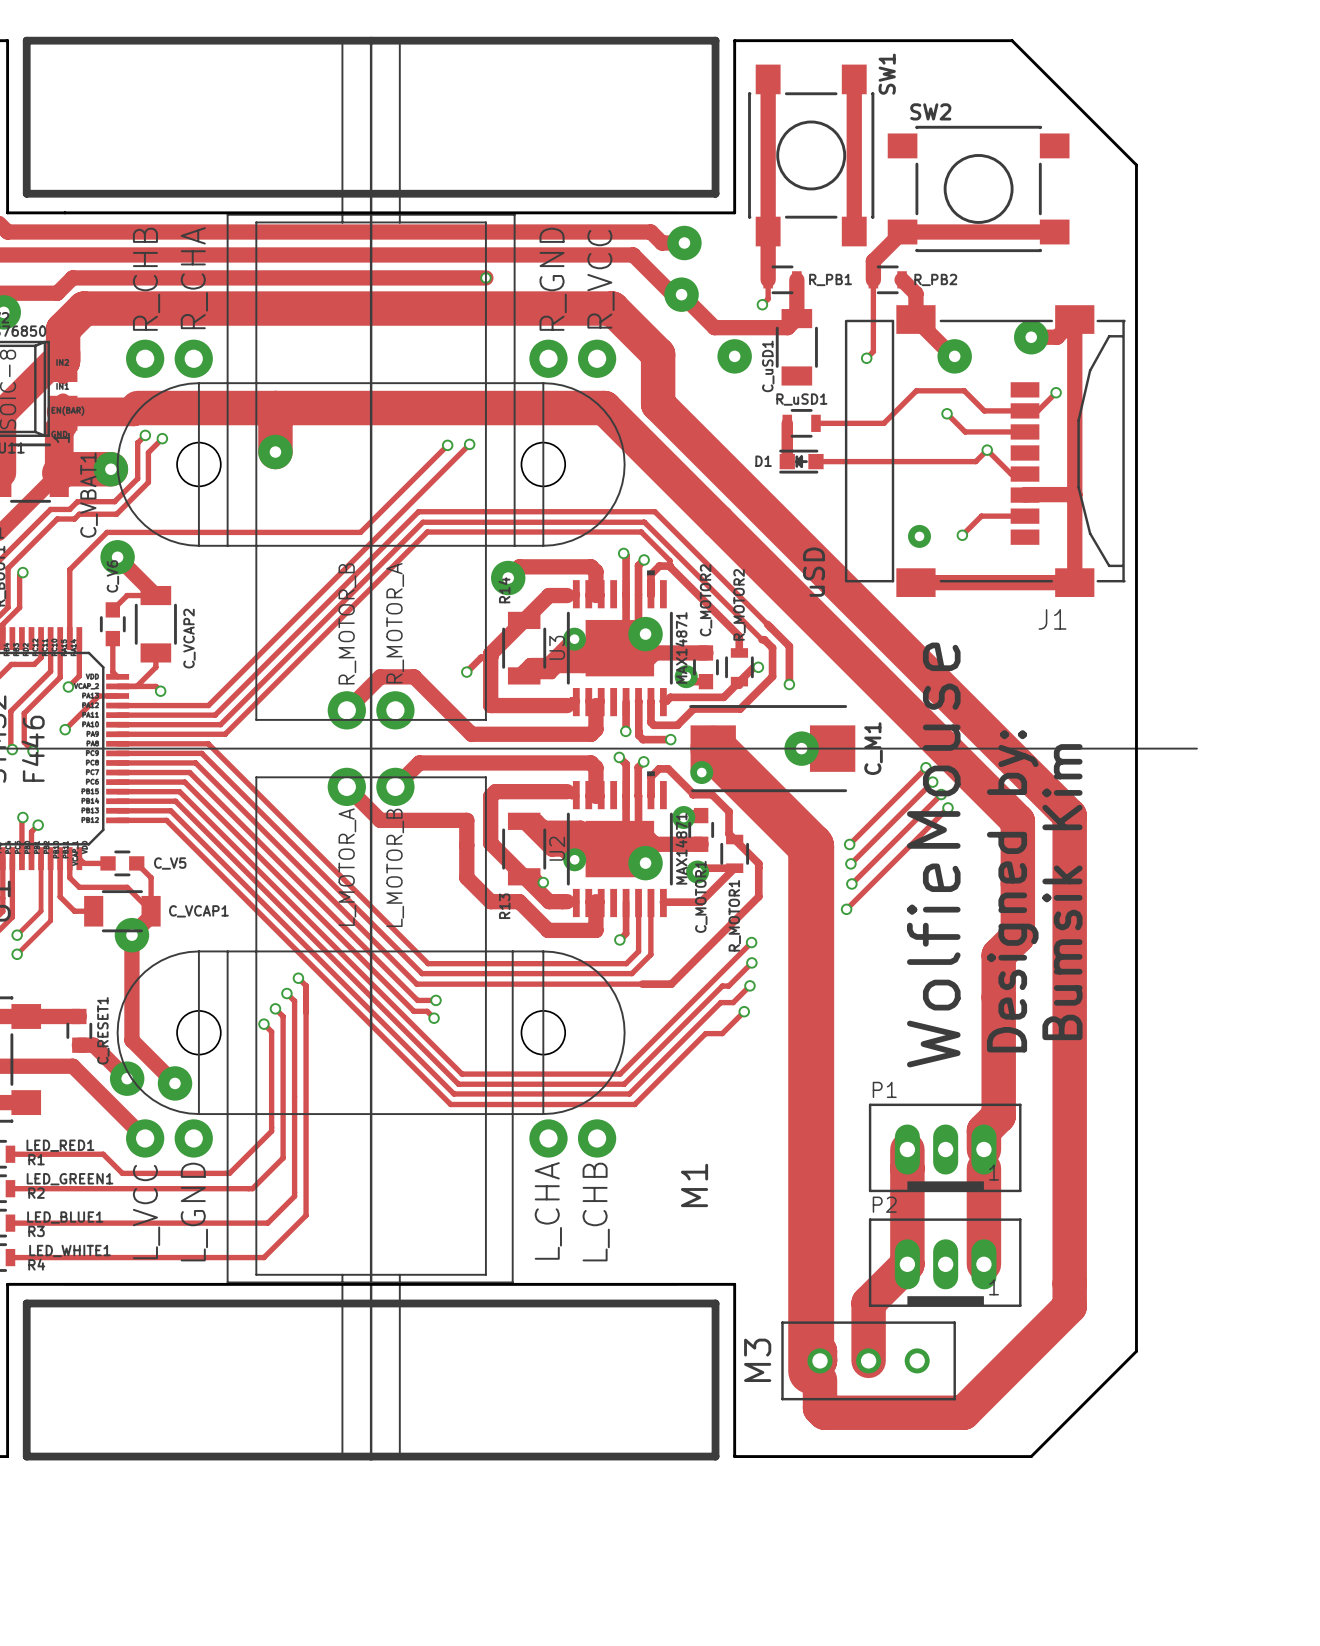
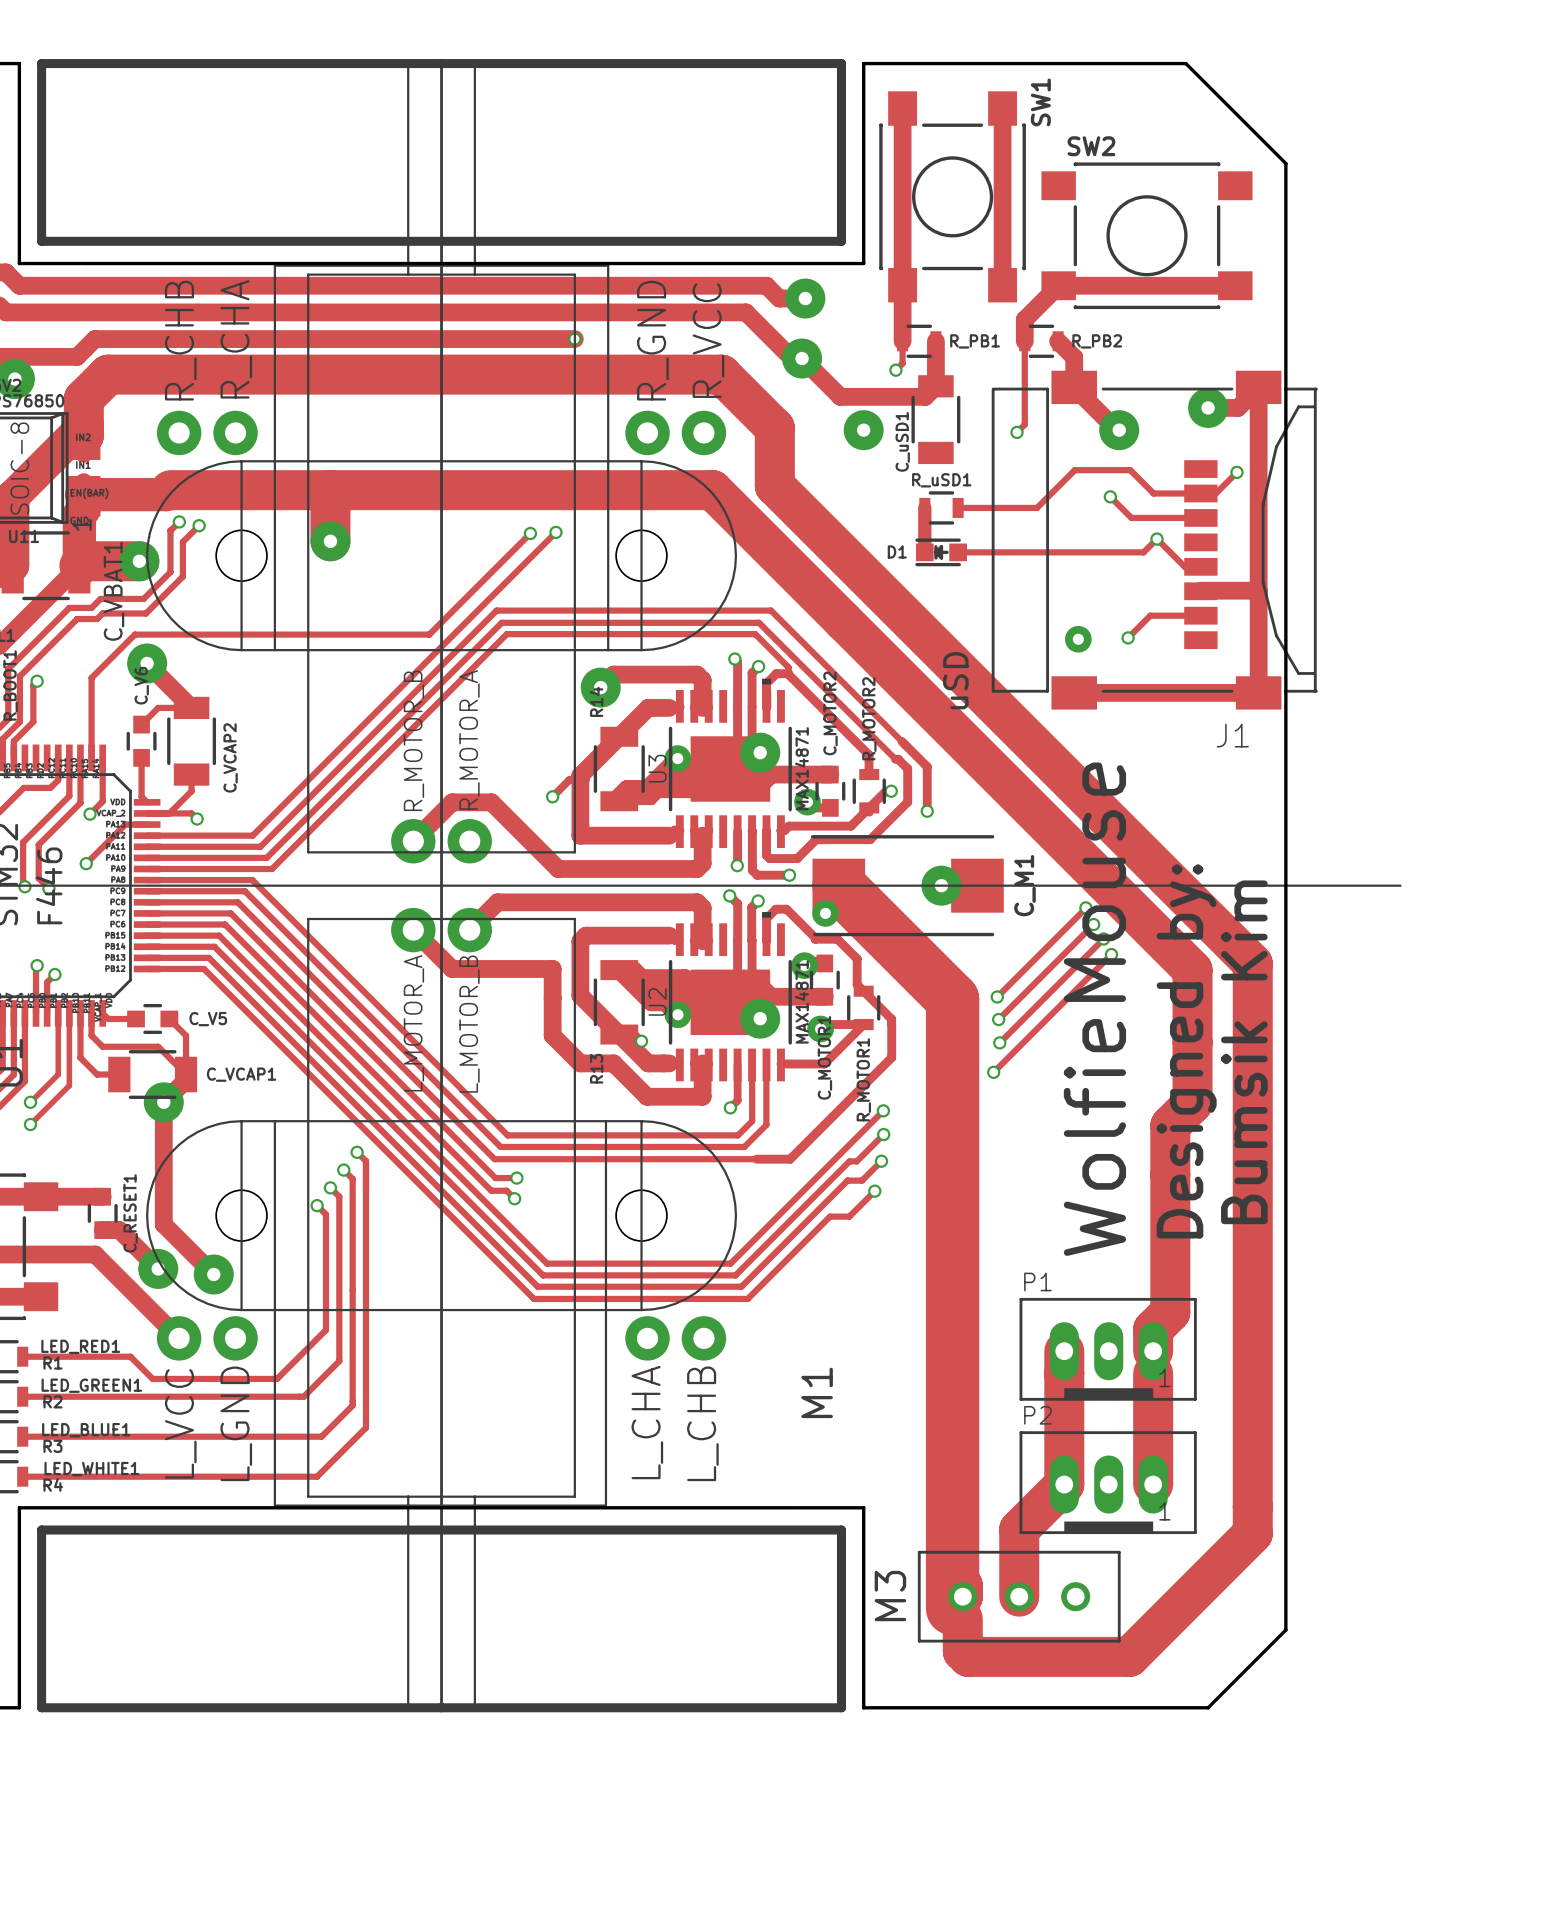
board edge: (1098, 126) (1136, 165) (1136, 1351) (1098, 1389) -> (1285, 163) (1285, 1630)

